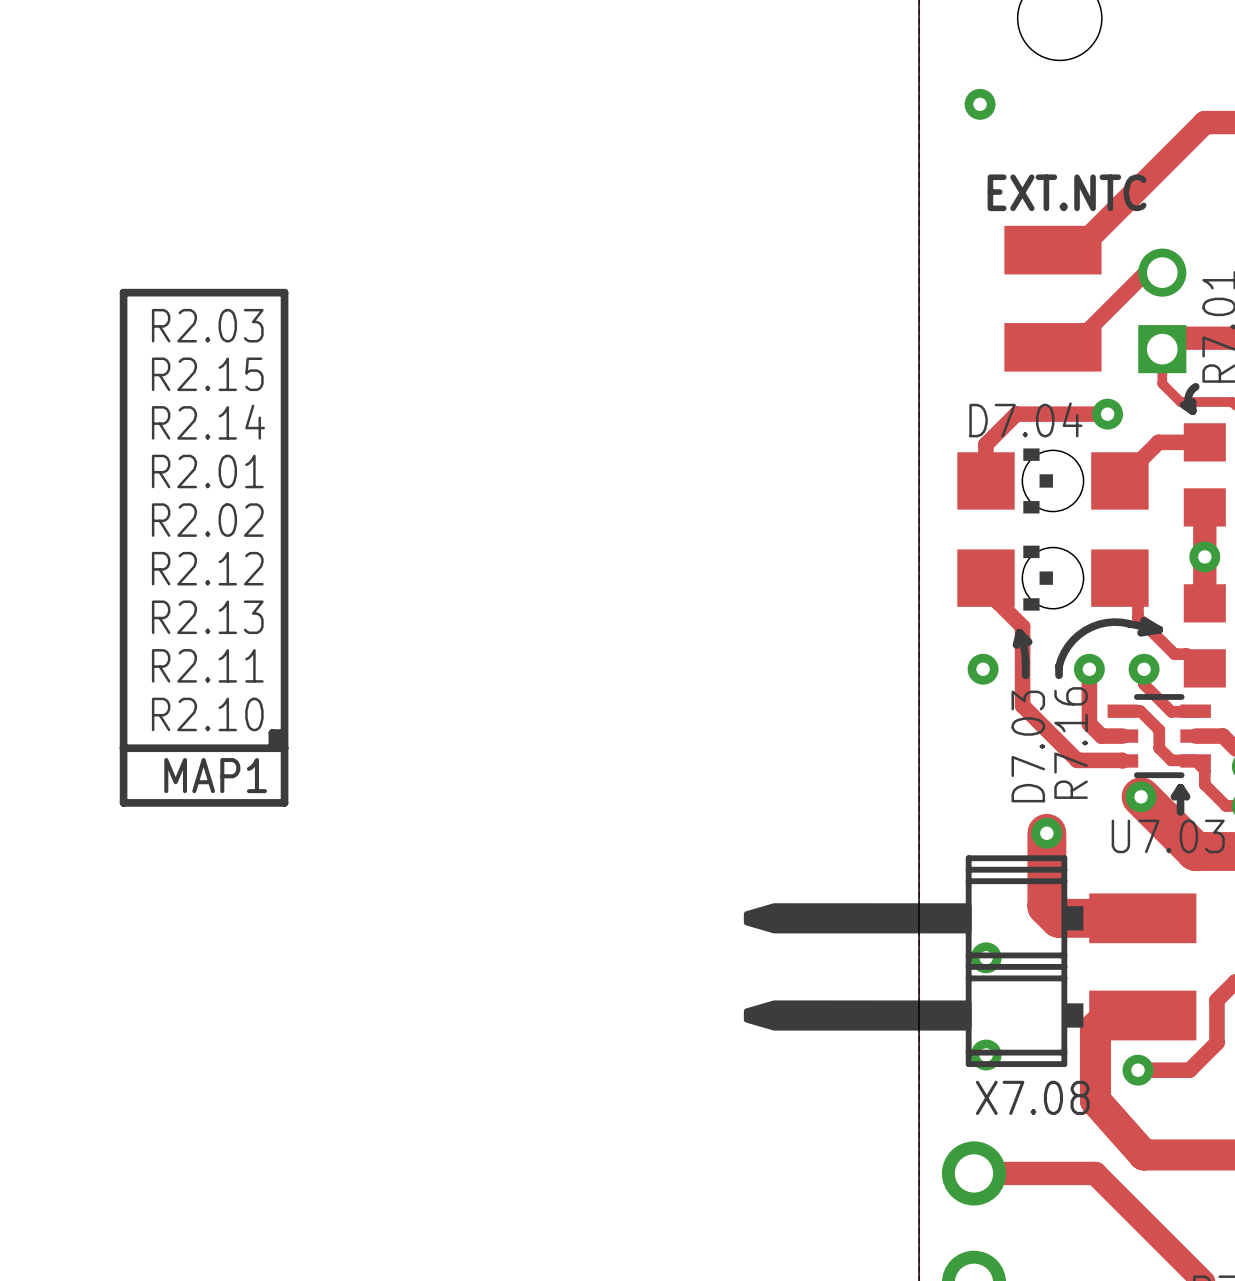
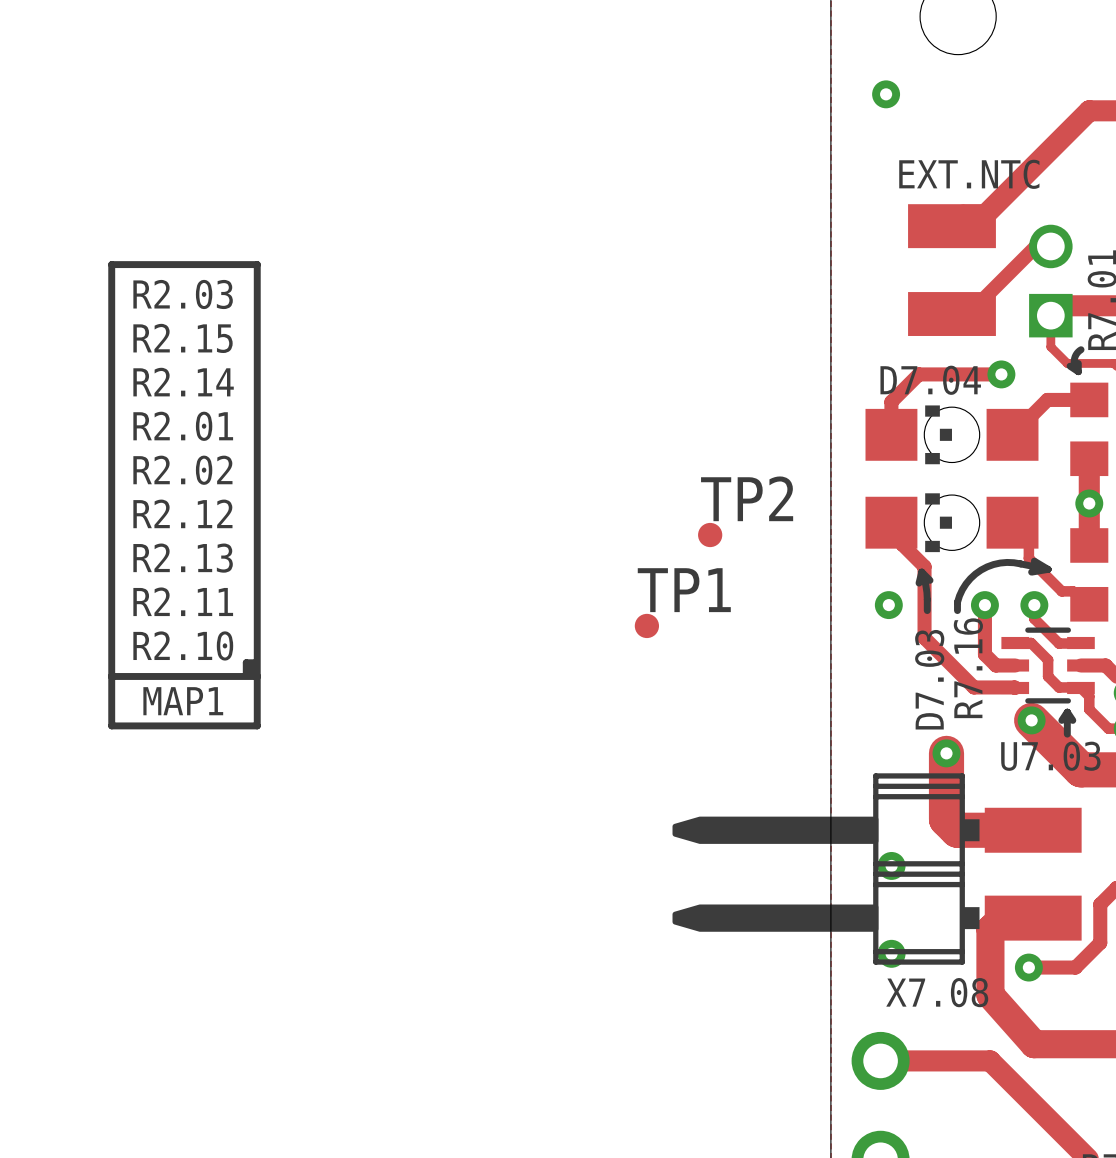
TP2: none -> (710, 535)
TP1: none -> (646, 625)

